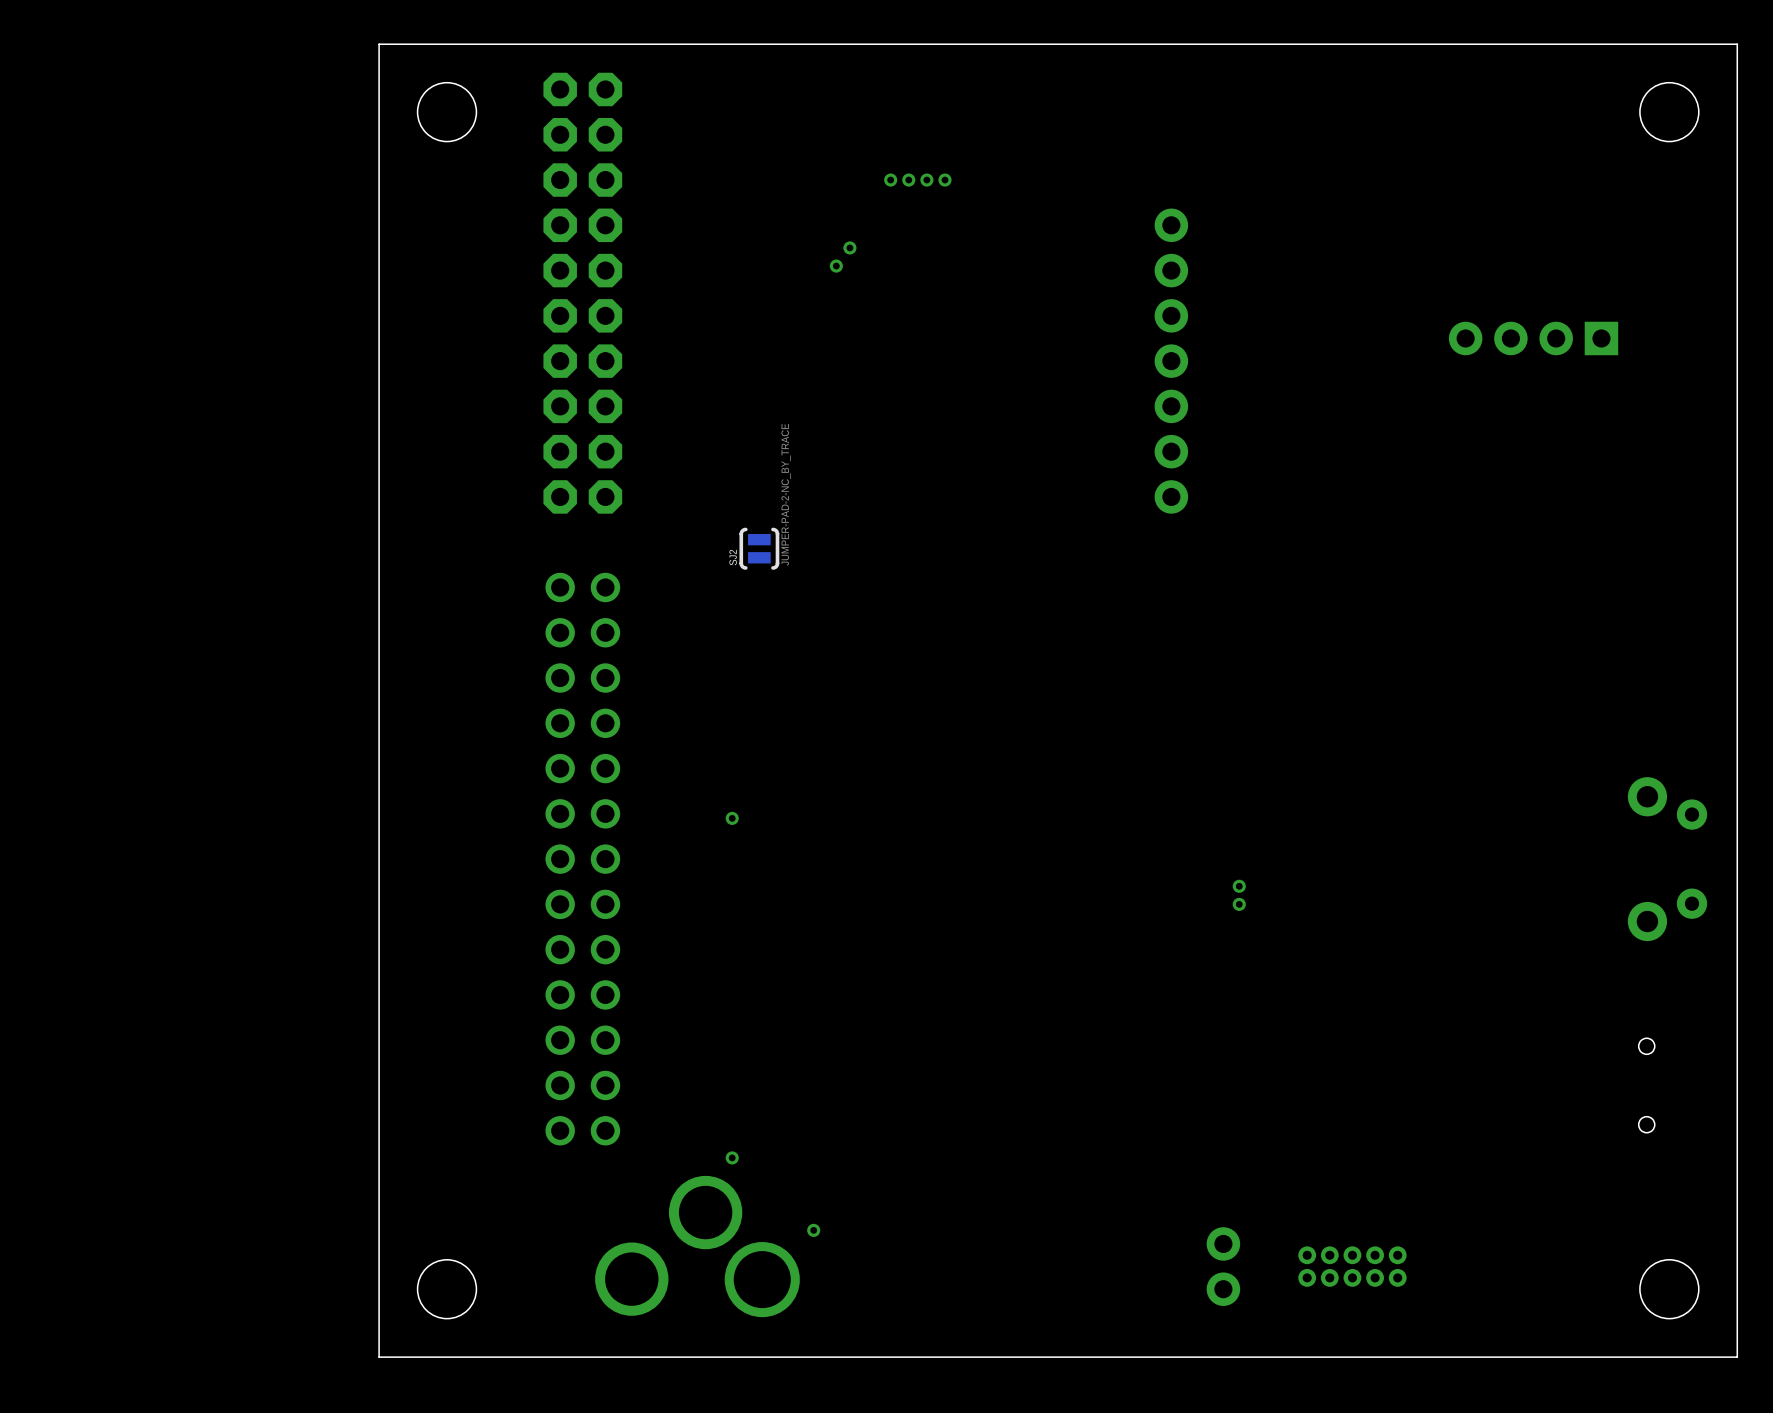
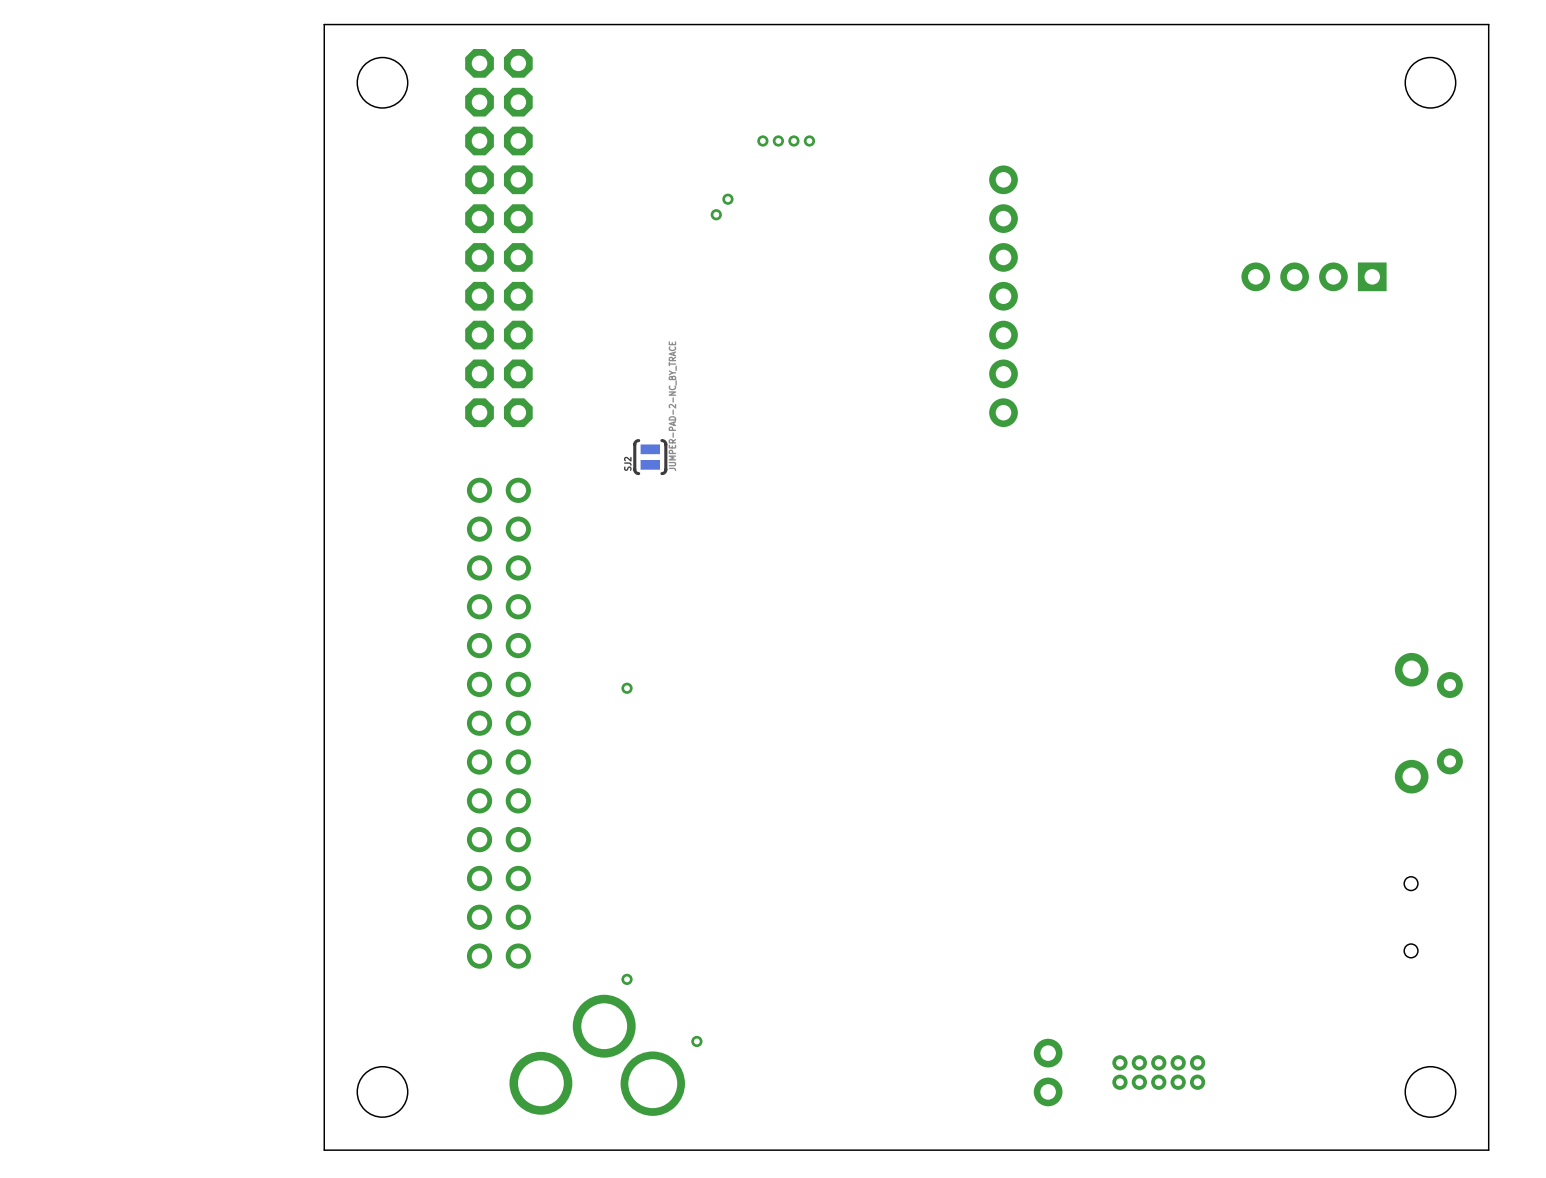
part: (1239, 886) -> none
part: (1239, 904) -> none

